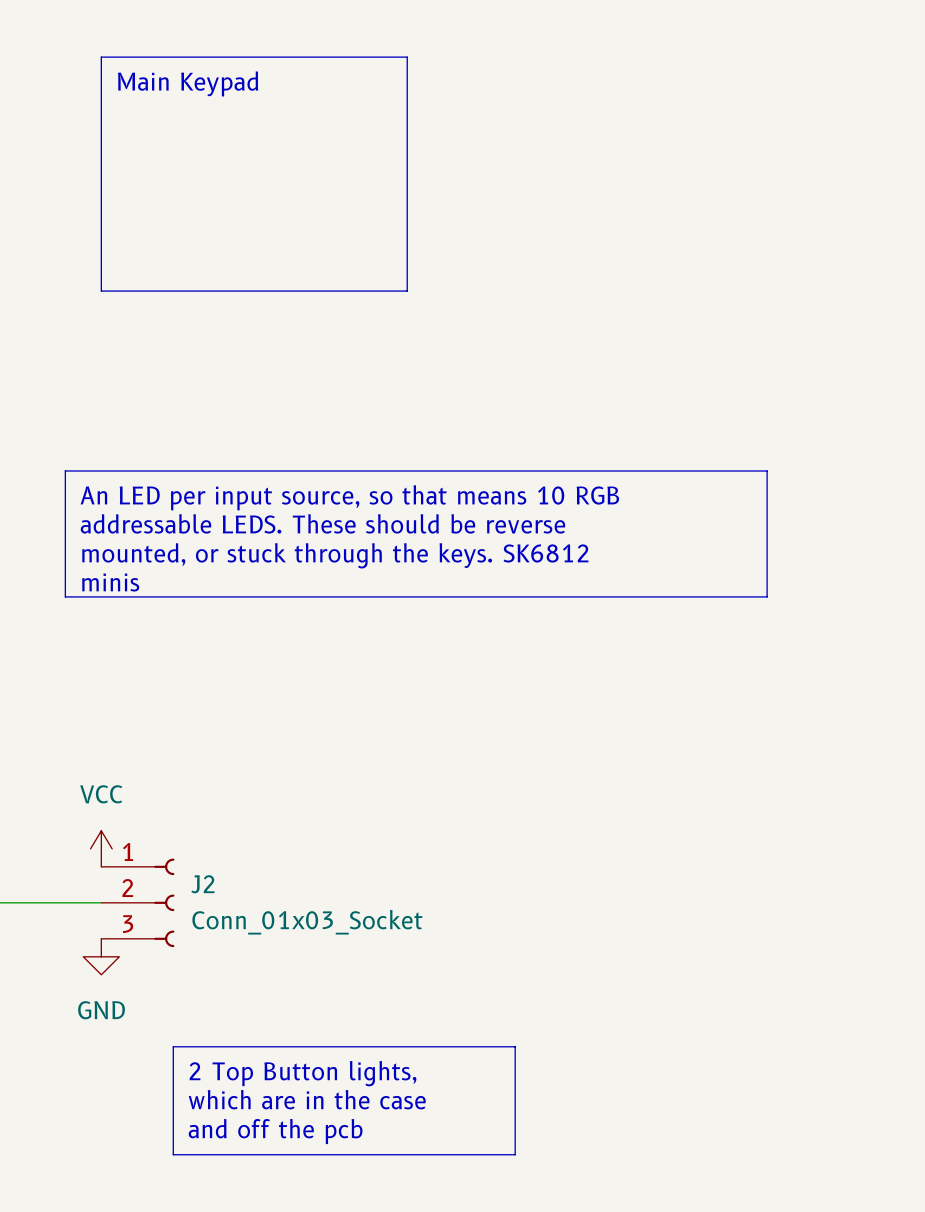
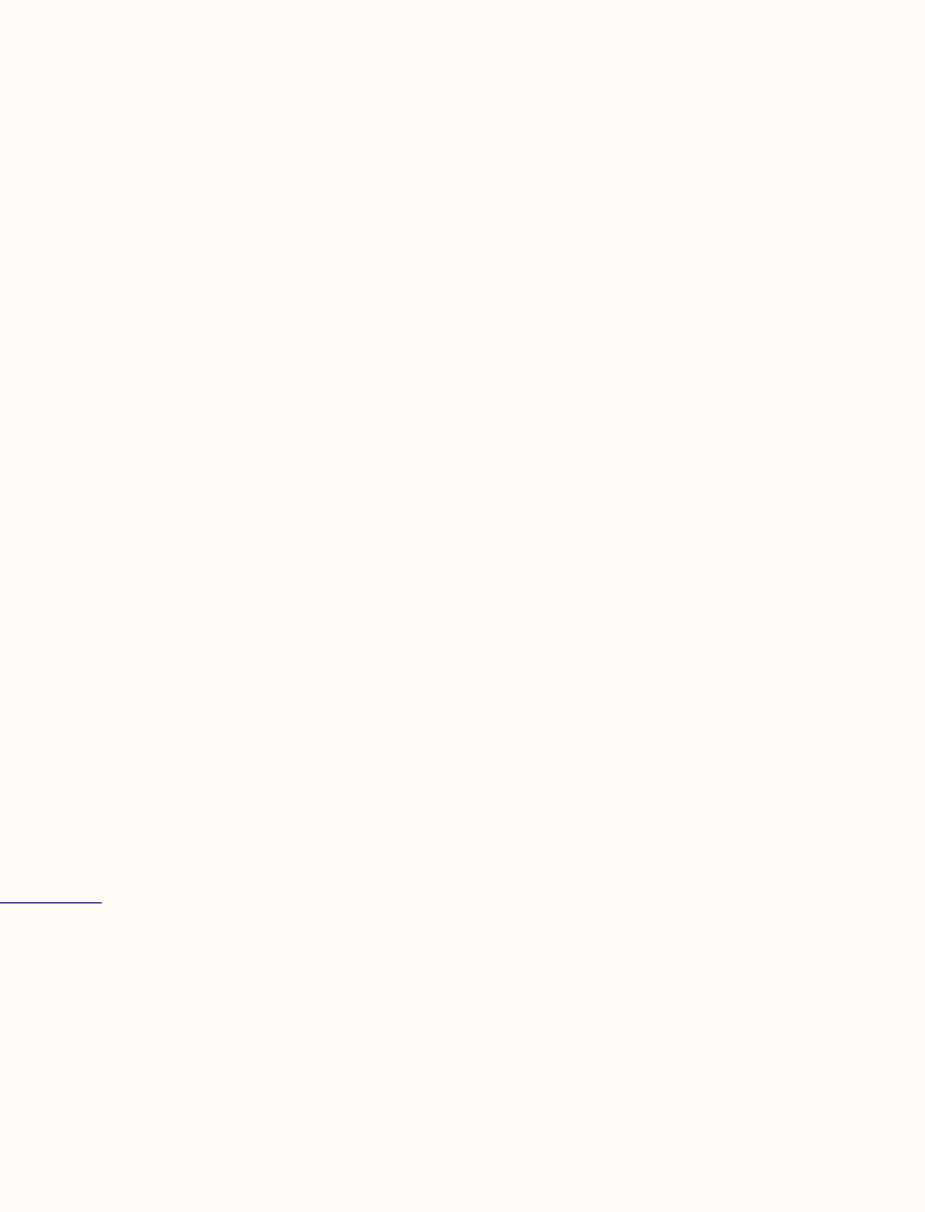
line: (101, 57) (407, 57) (407, 291) (101, 291) (101, 57) -> none
text: Main Keypad (188, 83) -> none
line: (65, 470) (767, 470) (767, 596) (65, 596) (65, 470) -> none
text: An LED per input source, so that means 10 RGB (349, 497) -> none
text: addressable LEDS. These should be reverse (322, 523) -> none
text: mounted, or stuck through the keys. SK6812 (335, 555) -> none
text: minis (110, 582) -> none
power symbol: VCC (101, 848) -> none
J2: Conn_01x03_Socket (137, 902) -> none
power symbol: GND (101, 956) -> none
line: (173, 1046) (515, 1046) (515, 1154) (173, 1154) (173, 1046) -> none
text: 2 Top Button lights, (303, 1073) -> none
text: which are in the case (307, 1099) -> none
text: and off the pcb (275, 1131) -> none

